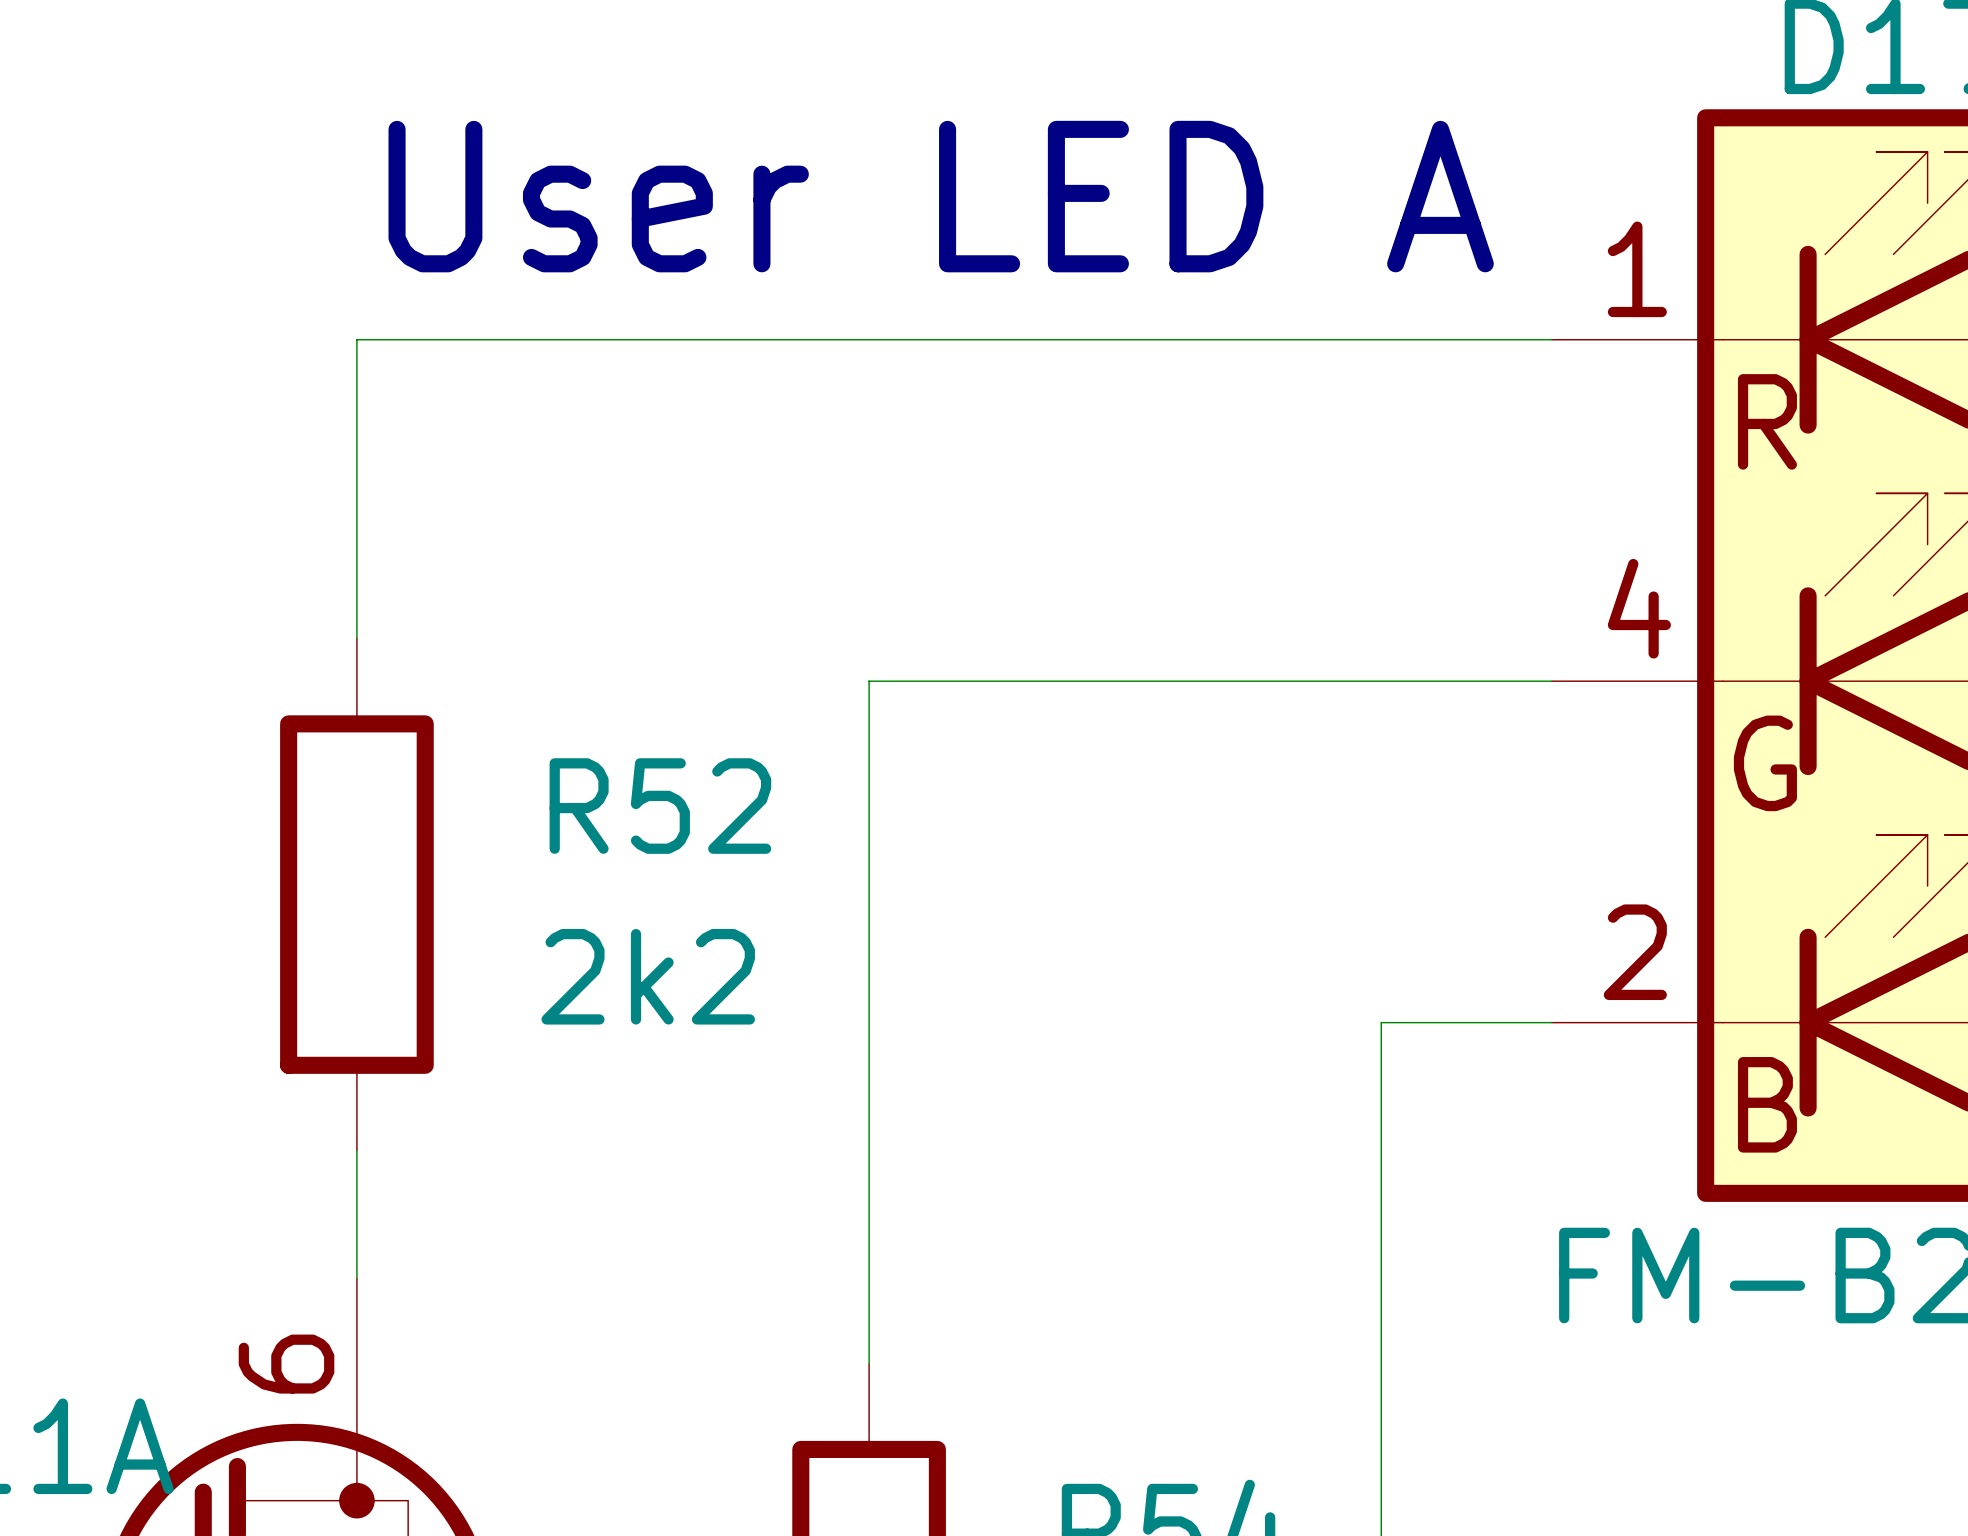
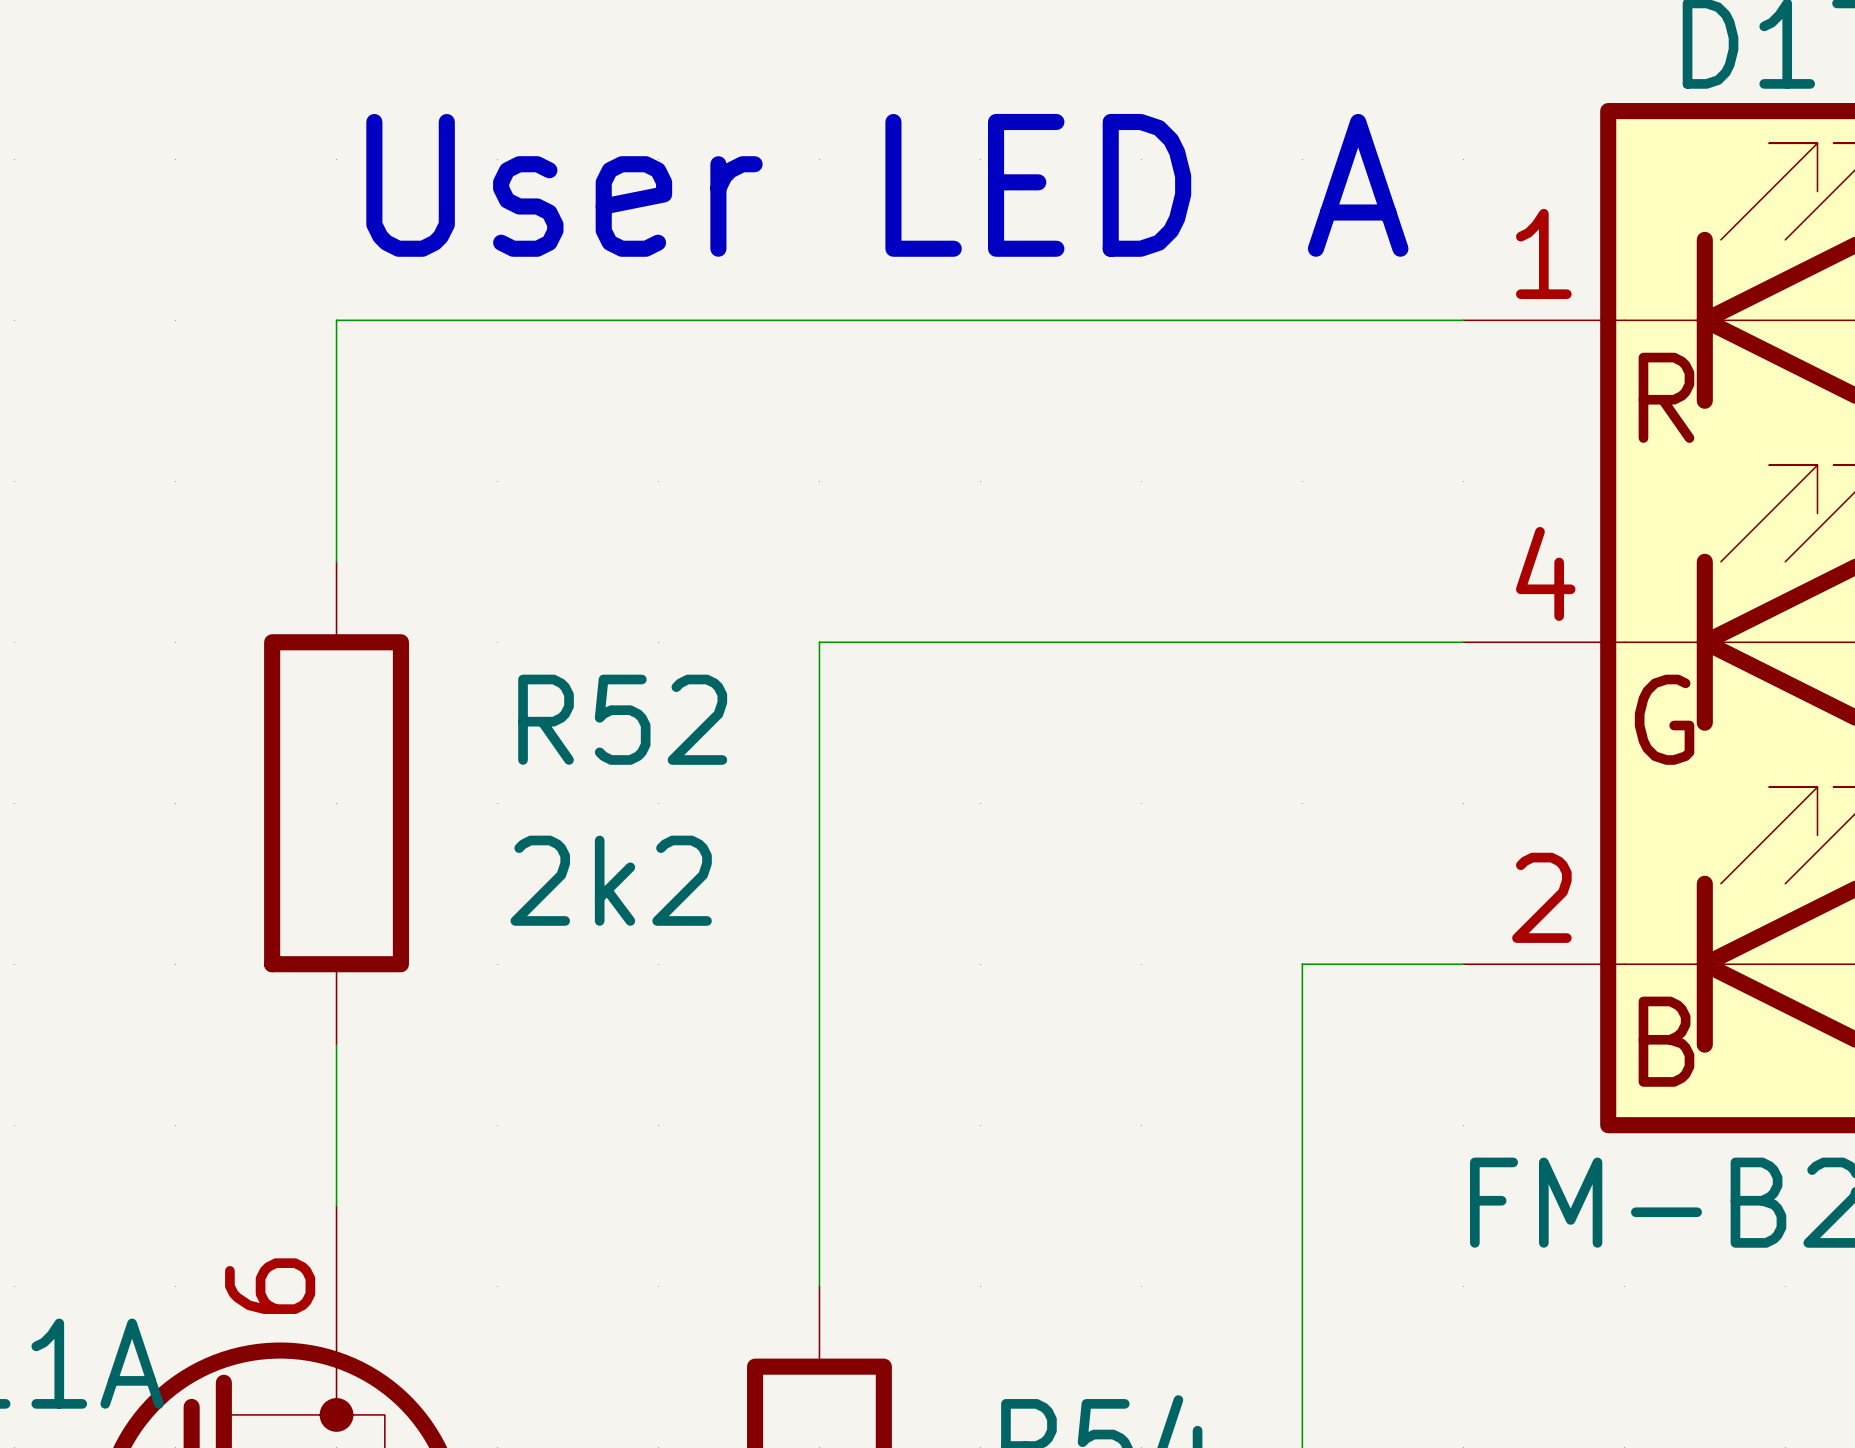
R52 position: (356, 894) -> (336, 803)

